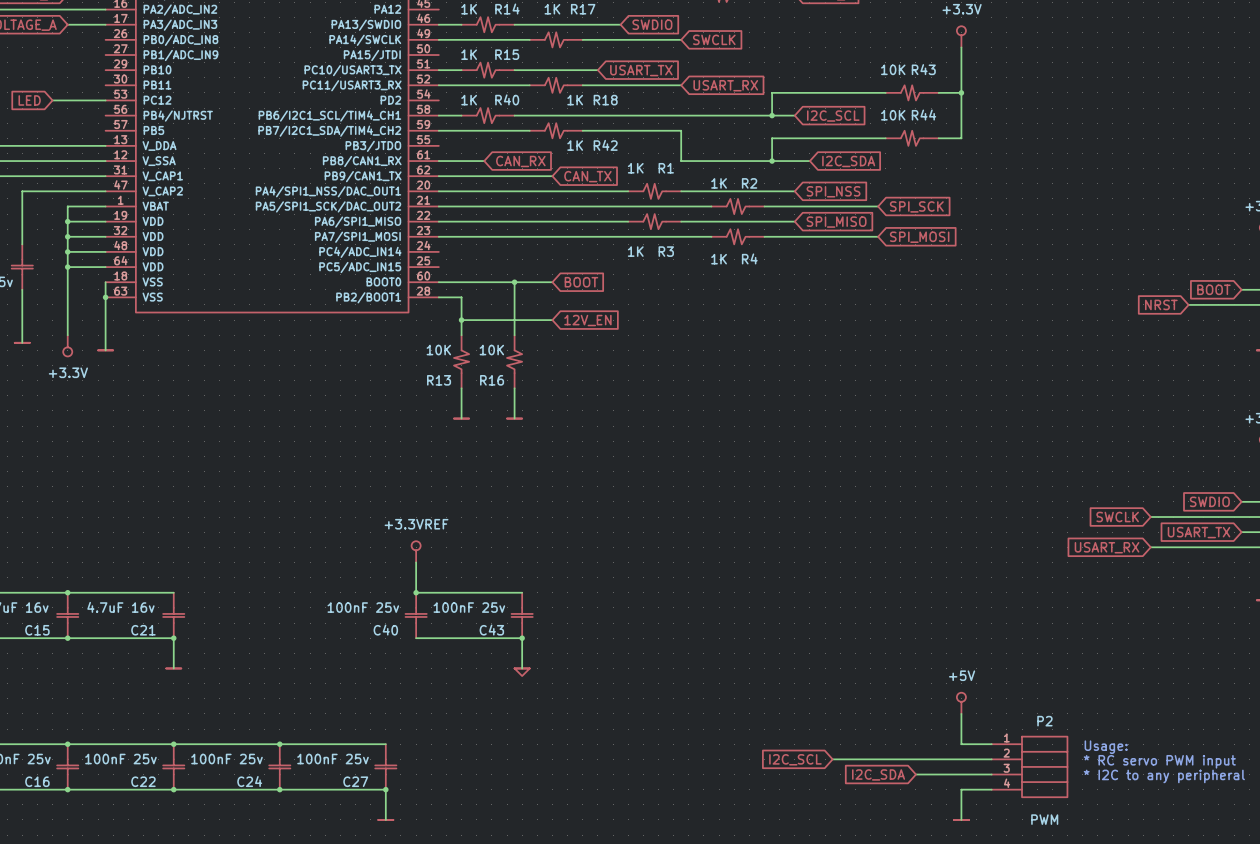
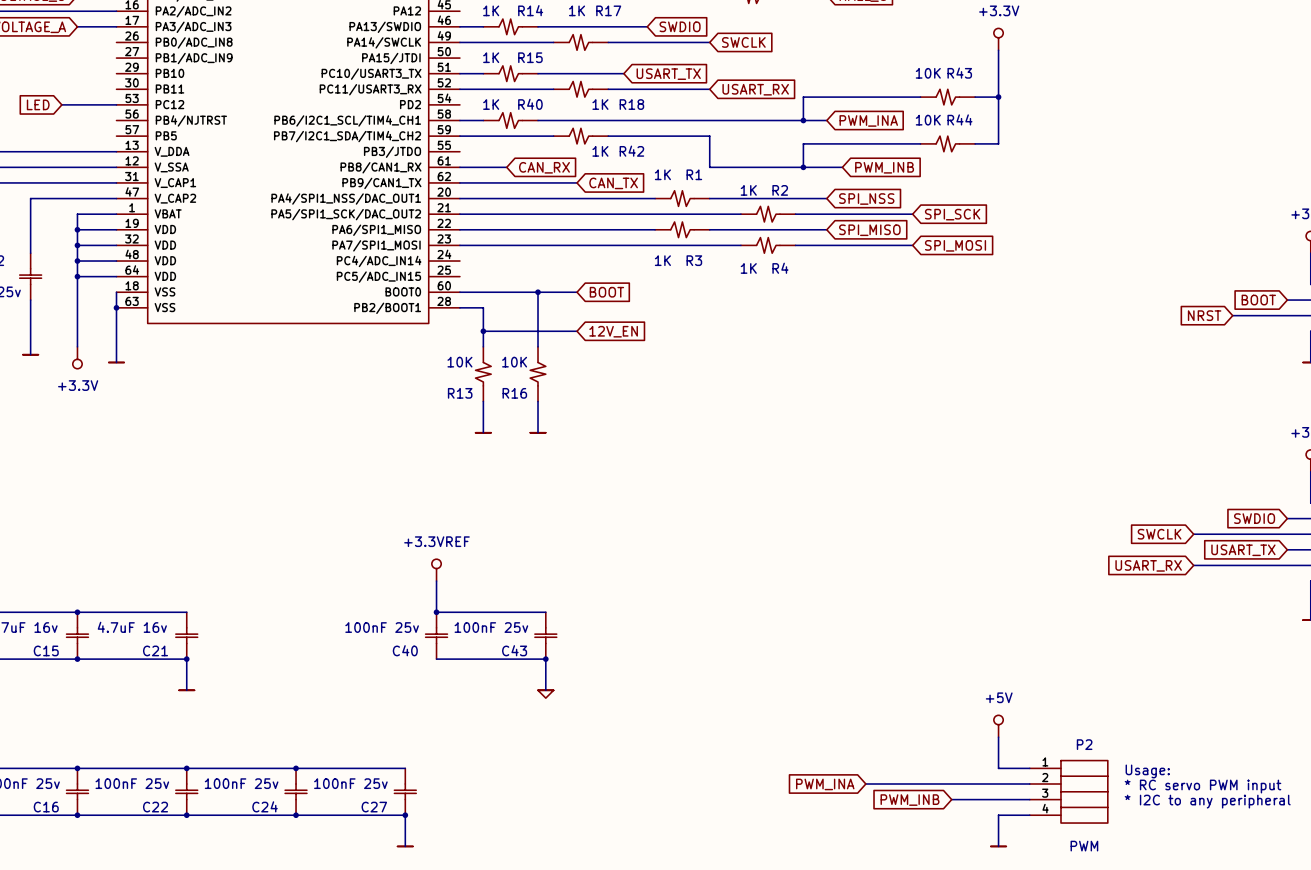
global label: I2C_SCL (833, 116) -> PWM_INA (868, 120)
global label: I2C_SDA (848, 161) -> PWM_INB (884, 167)
global label: I2C_SCL (795, 759) -> PWM_INA (825, 784)
global label: I2C_SDA (878, 774) -> PWM_INB (910, 800)

